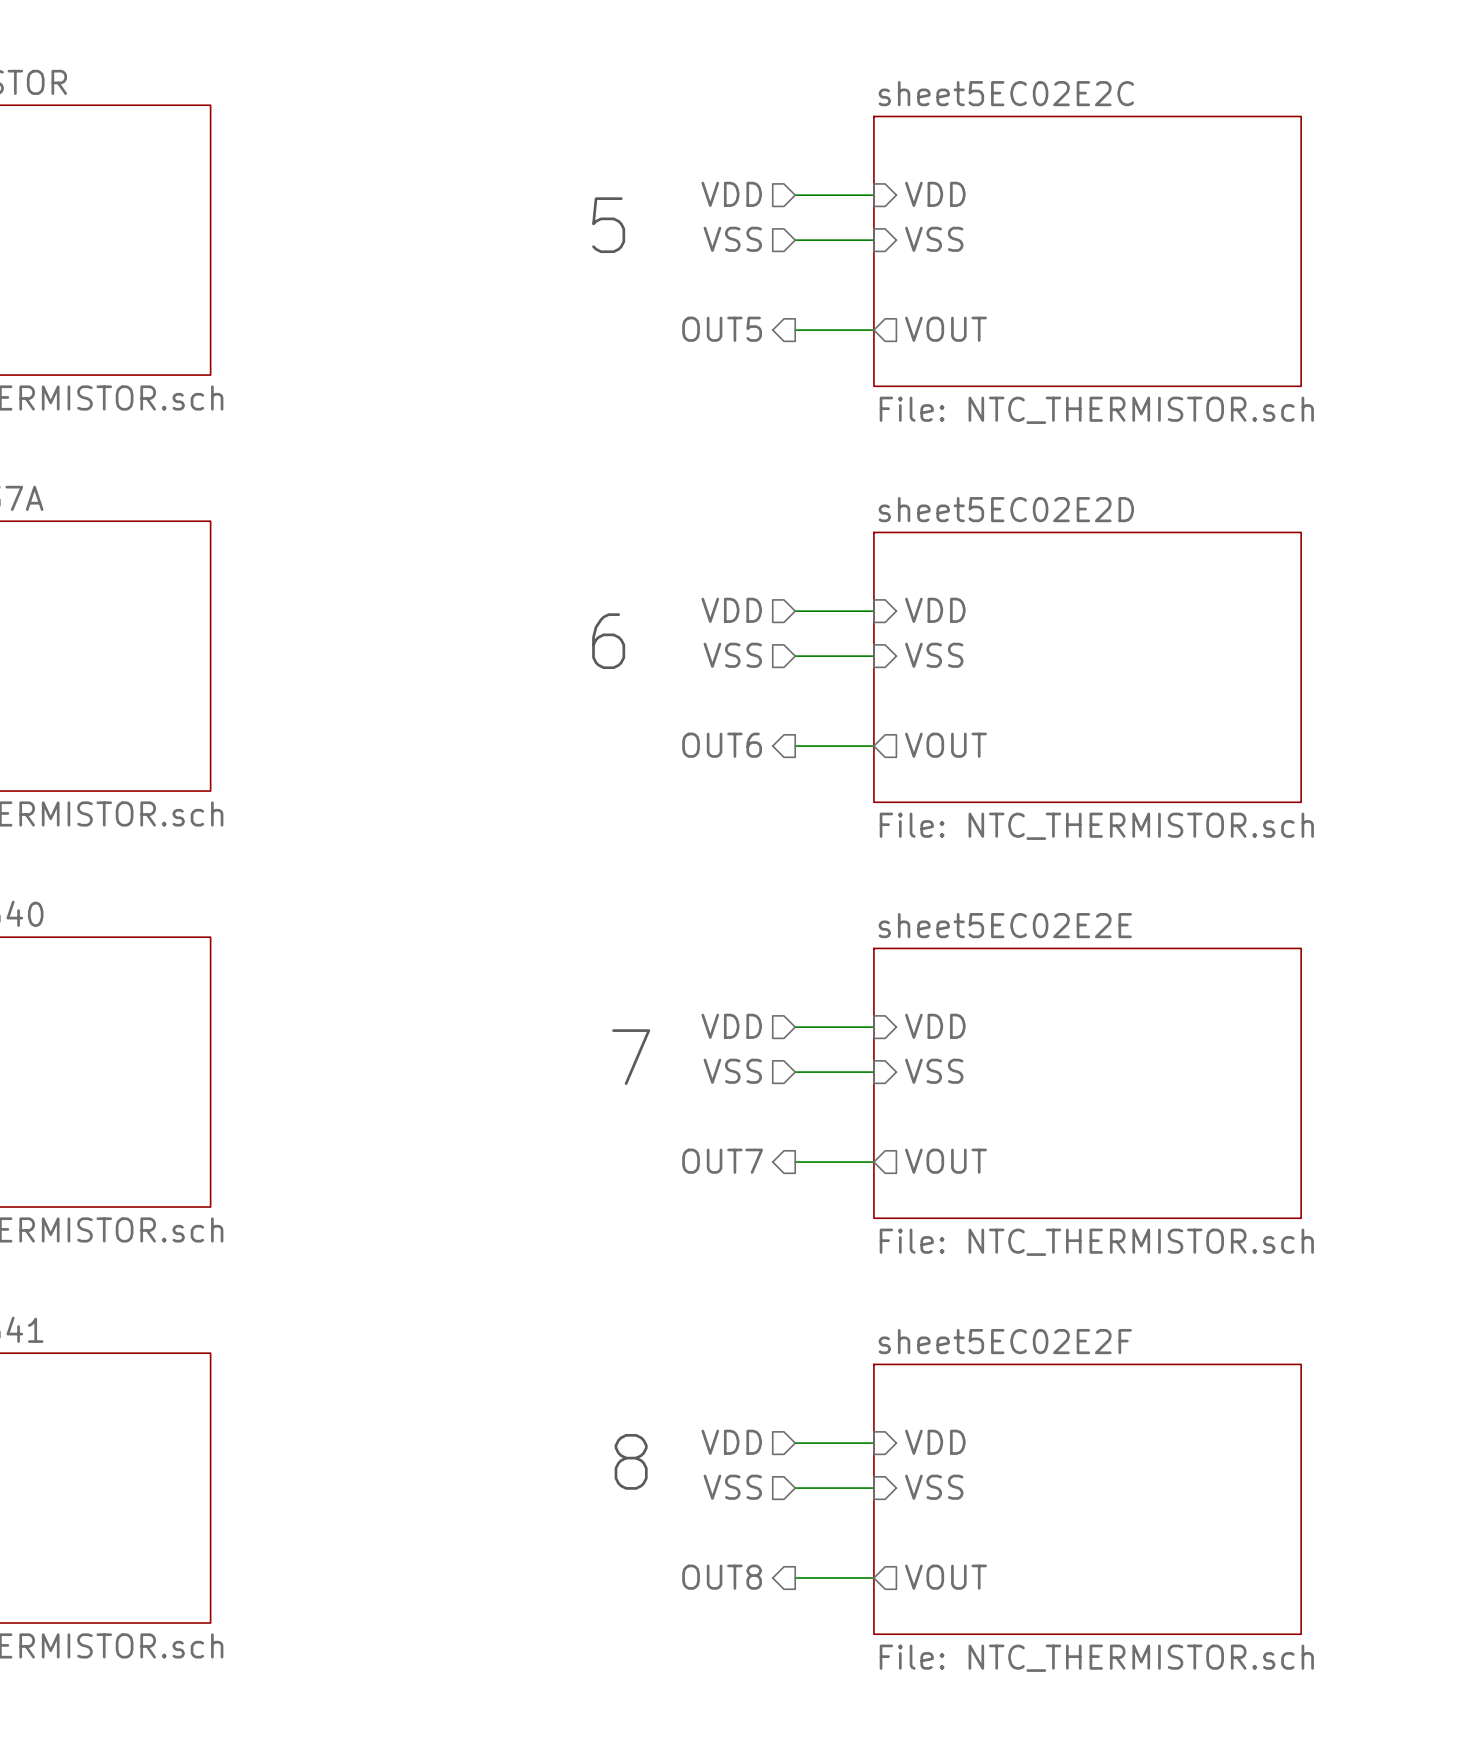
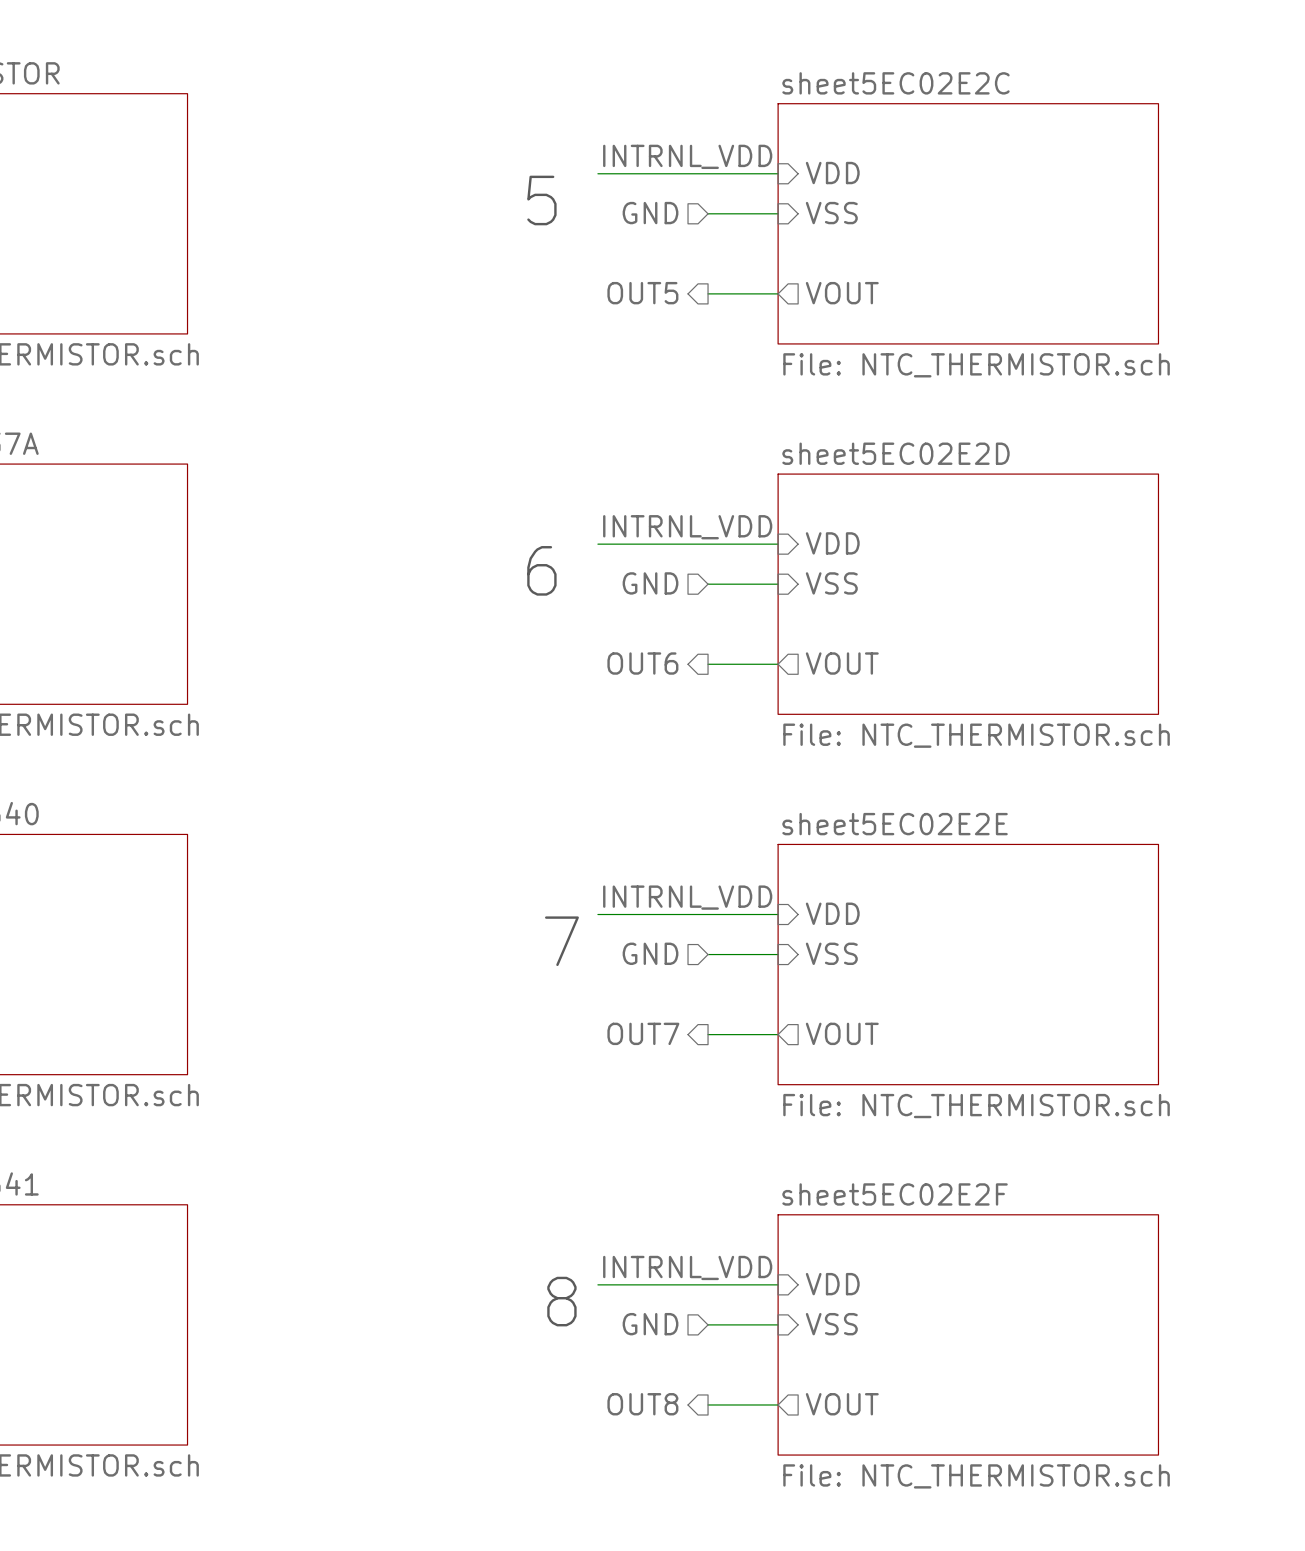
label: none -> INTRNL_VDD (687, 156)
hierarchical label: VDD (731, 194) -> none
wire: none -> (597, 173) (708, 173)
hierarchical label: VSS (732, 239) -> GND (650, 213)
label: none -> INTRNL_VDD (687, 527)
hierarchical label: VDD (731, 610) -> none
wire: none -> (597, 544) (708, 544)
hierarchical label: VSS (732, 655) -> GND (650, 583)
label: none -> INTRNL_VDD (687, 897)
hierarchical label: VDD (731, 1026) -> none
wire: none -> (597, 914) (708, 914)
hierarchical label: VSS (732, 1071) -> GND (650, 953)
label: none -> INTRNL_VDD (687, 1267)
hierarchical label: VDD (731, 1442) -> none
wire: none -> (597, 1284) (708, 1284)
hierarchical label: VSS (732, 1487) -> GND (650, 1324)

